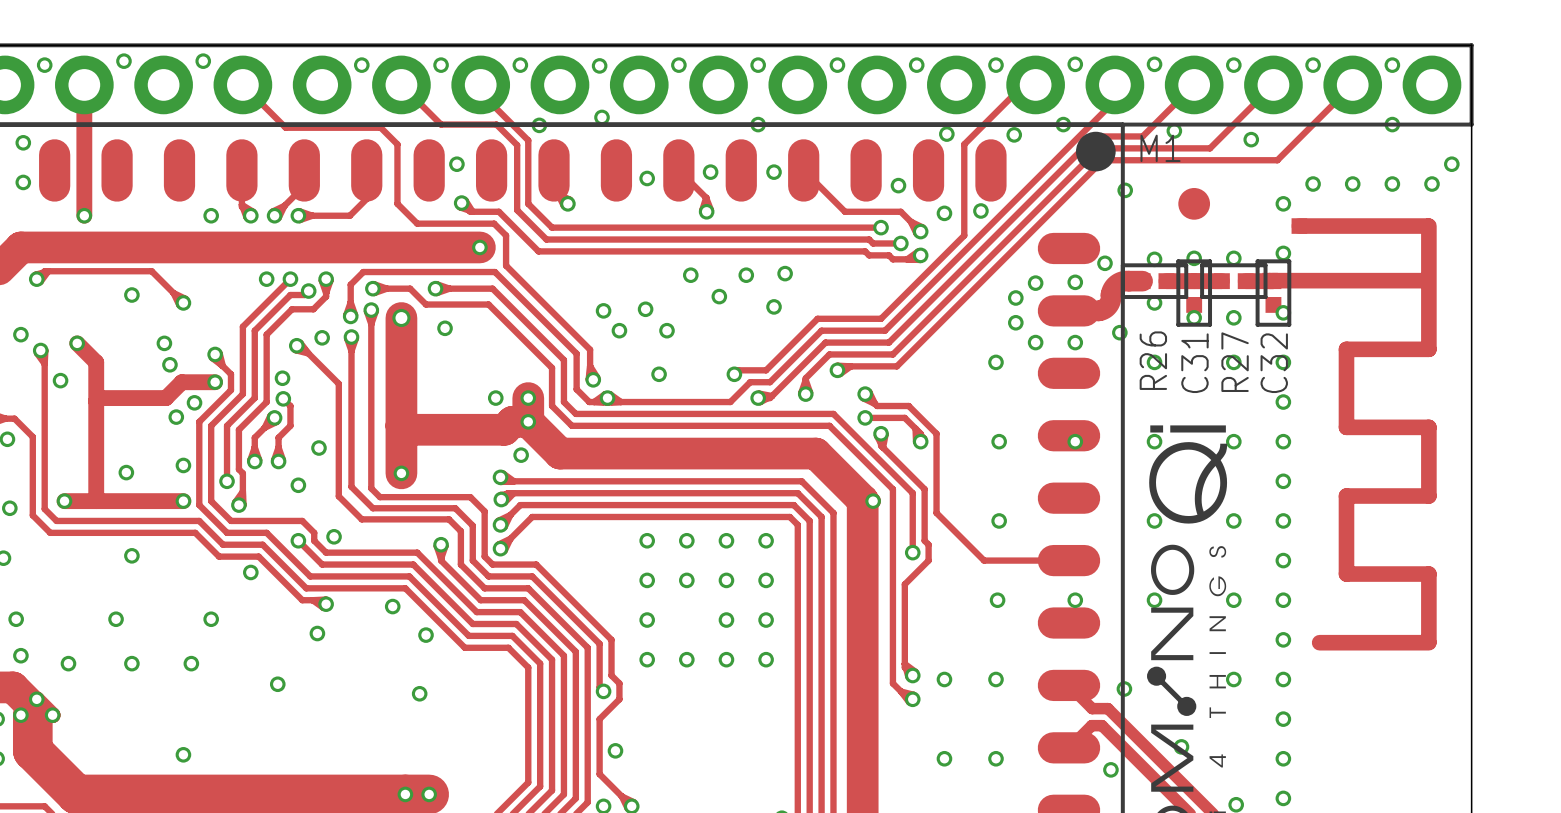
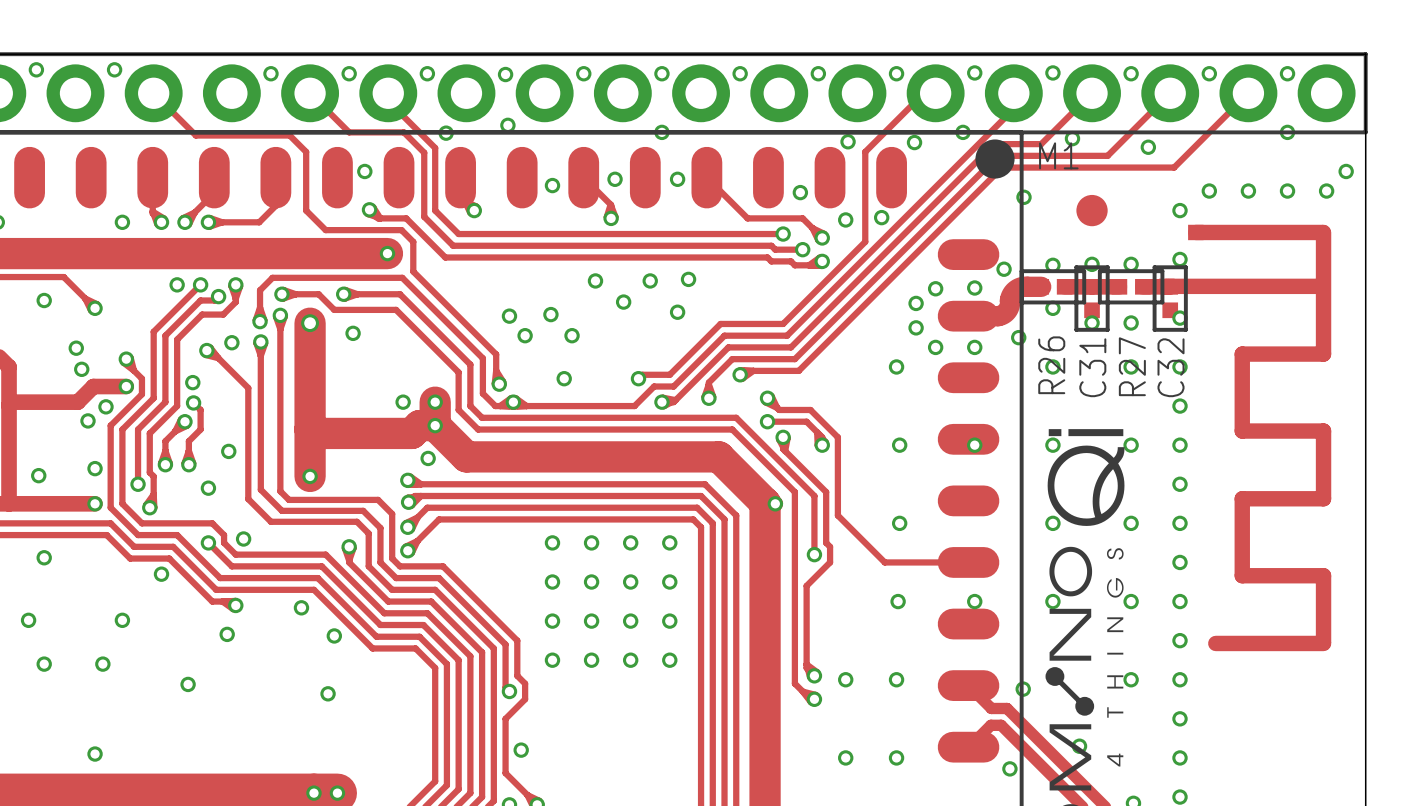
via: none -> (591, 621)

